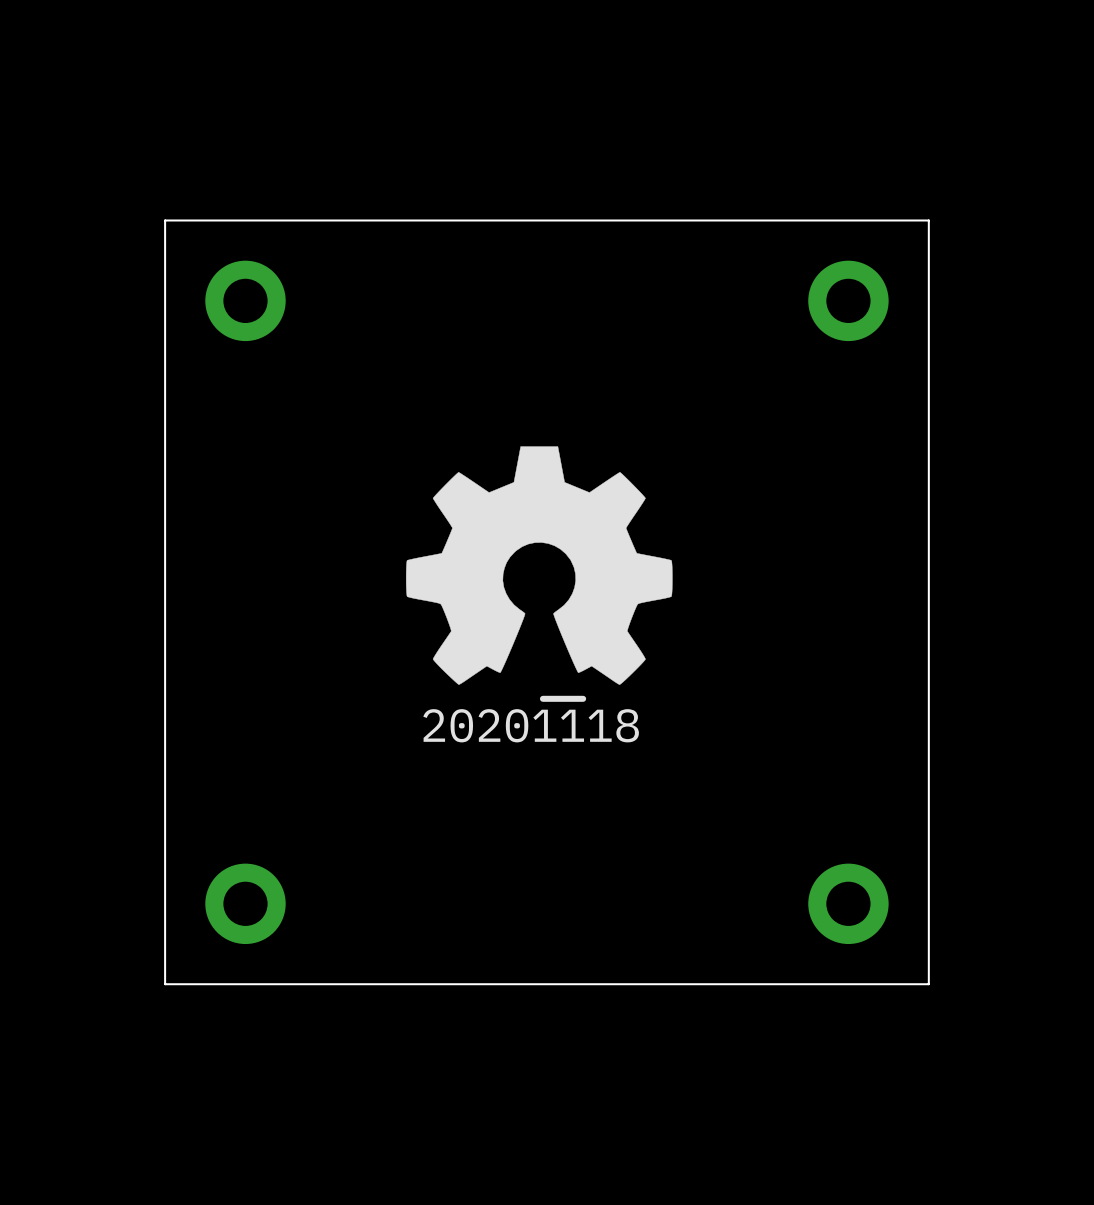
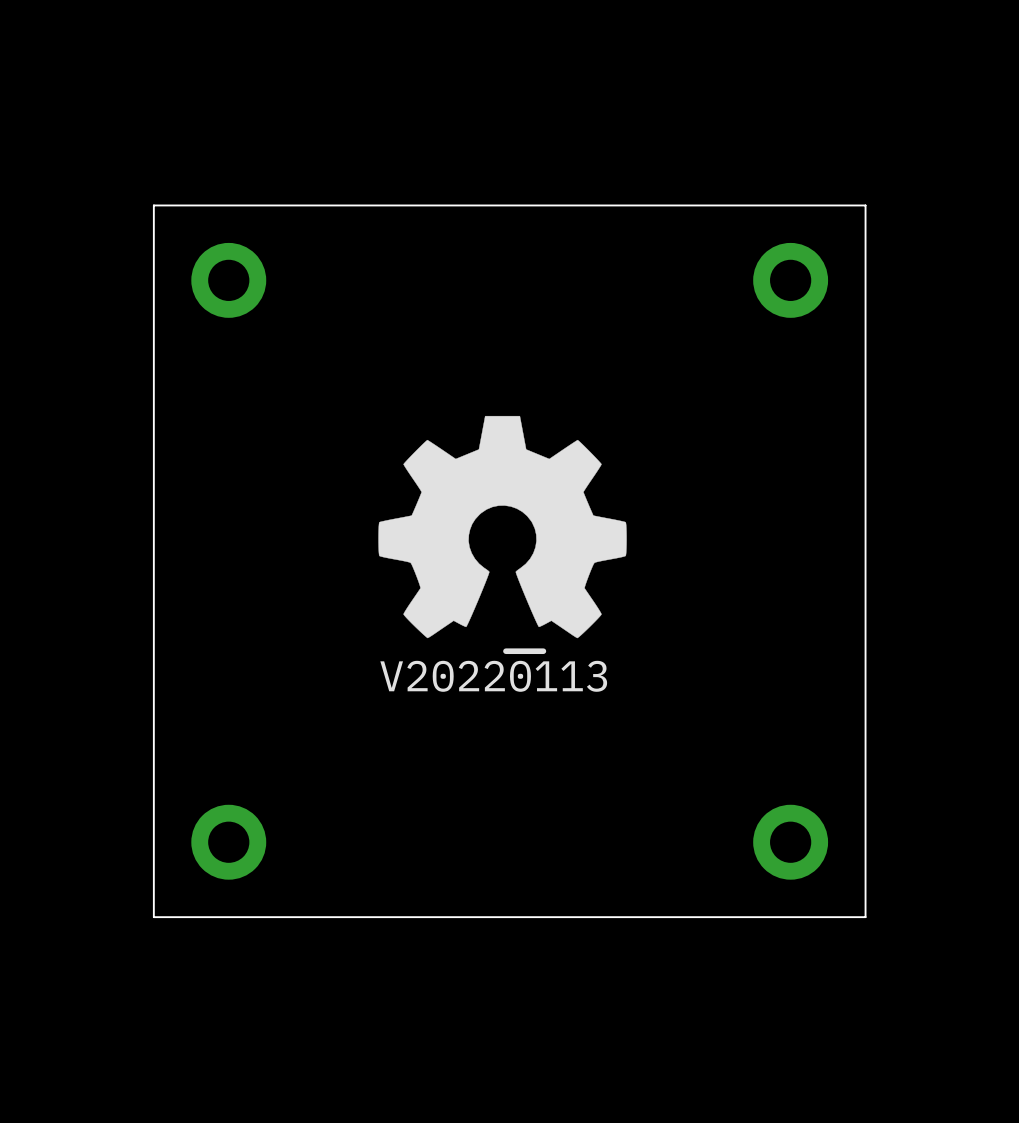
drawing shape: [423, 695, 639, 743] -> [380, 648, 608, 692]

